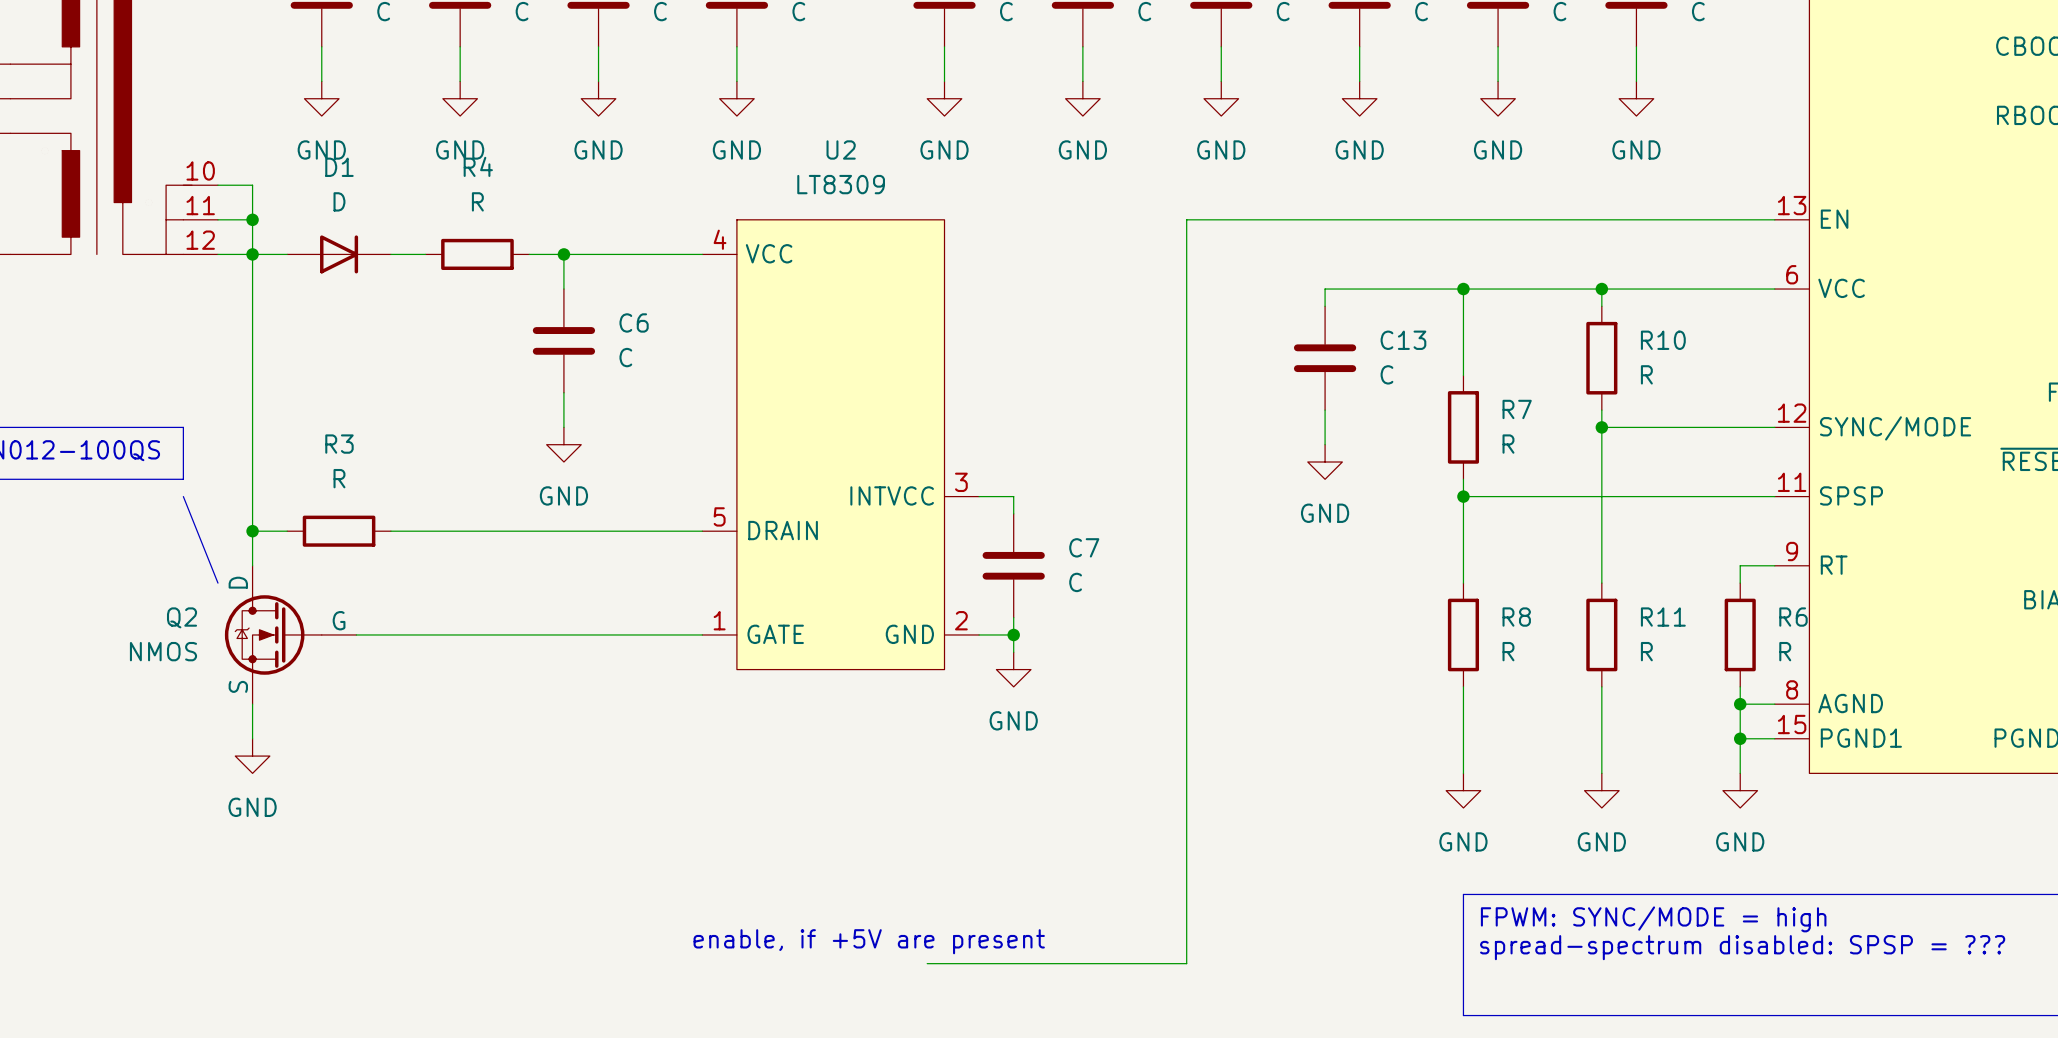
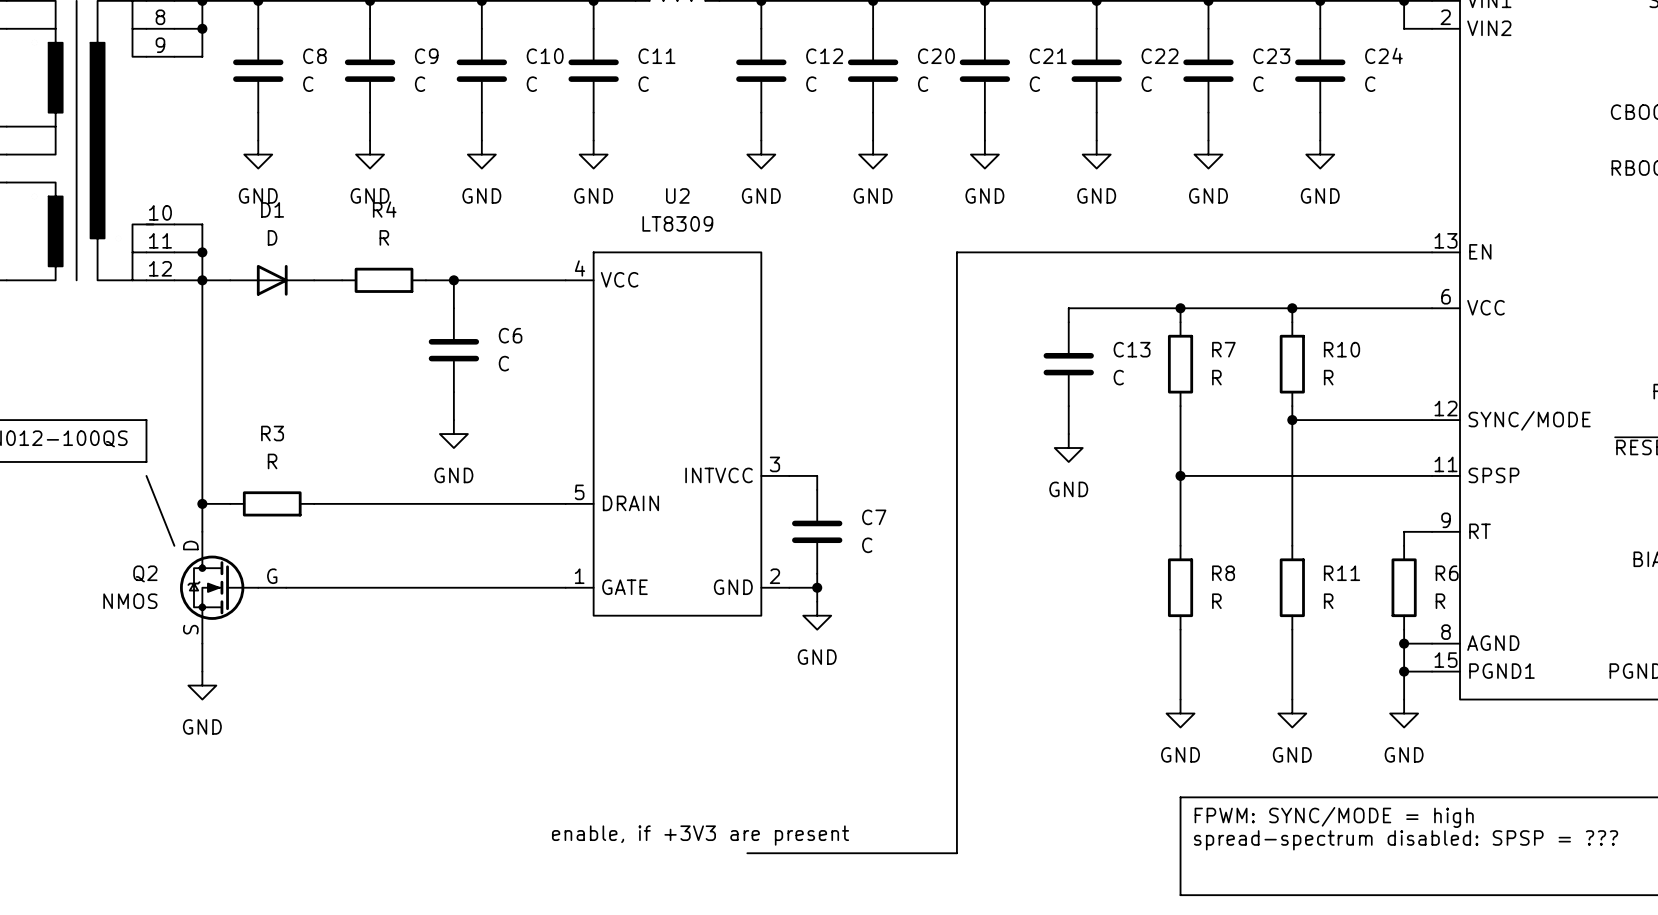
wire: (1463, 306) (1463, 375) -> (1180, 406) (1180, 461)
R7 position: (1463, 427) -> (1180, 364)
text: enable, if +5V are present (869, 941) -> enable, if +3V3 are present (700, 835)

